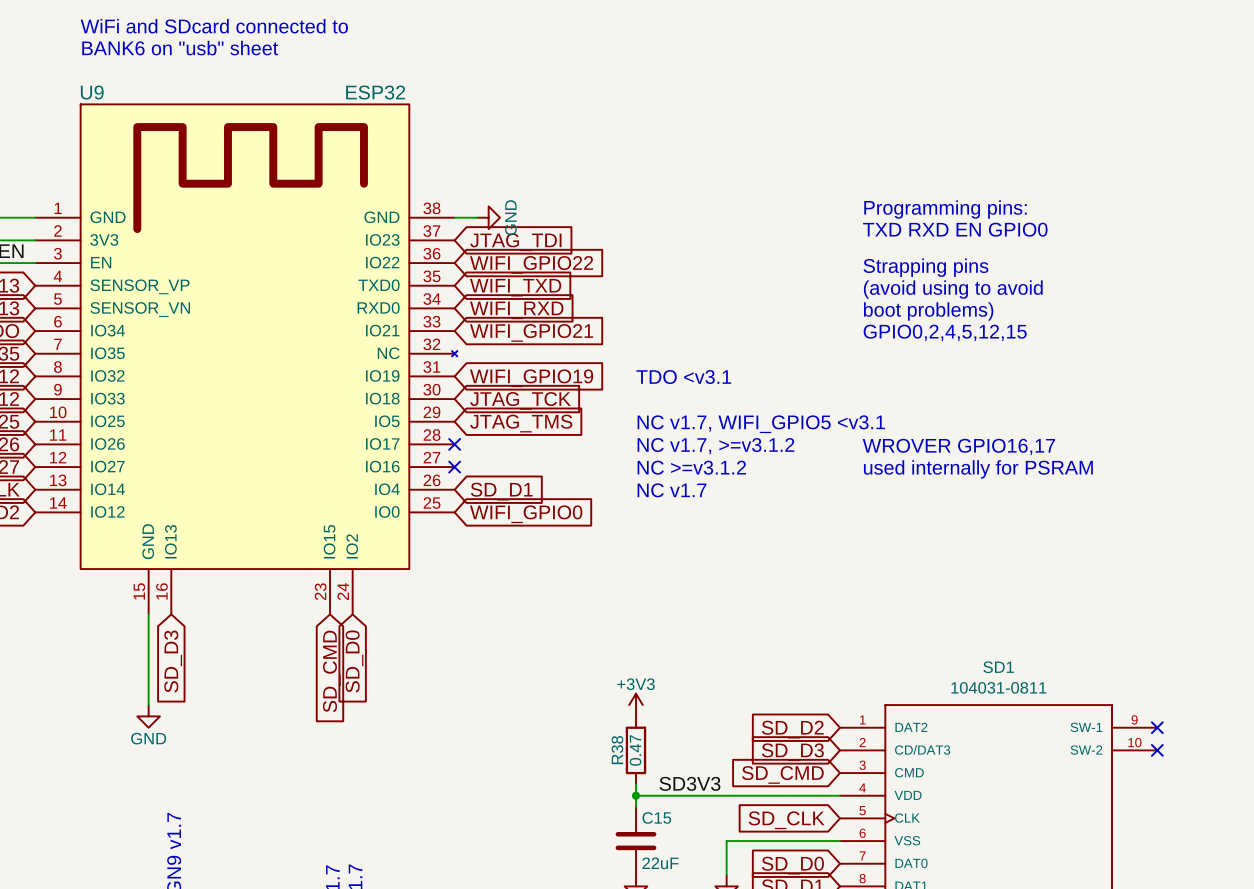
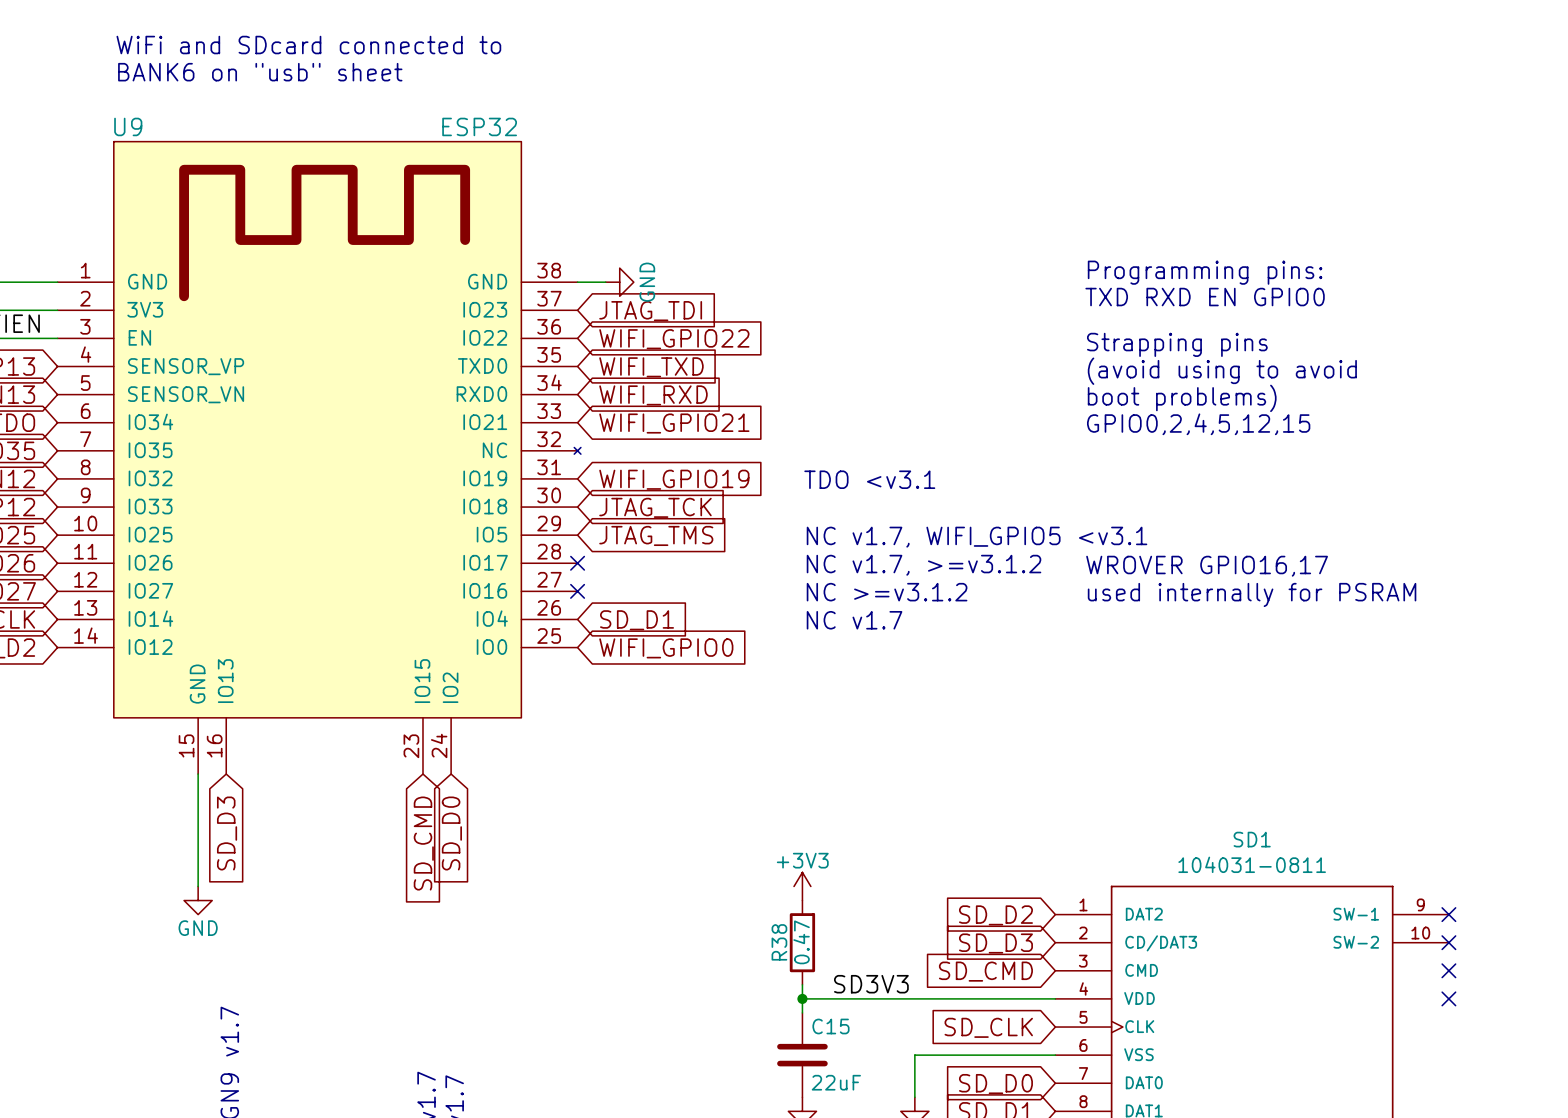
no-connect mark: none -> (1448, 970)
no-connect mark: none -> (1448, 998)

